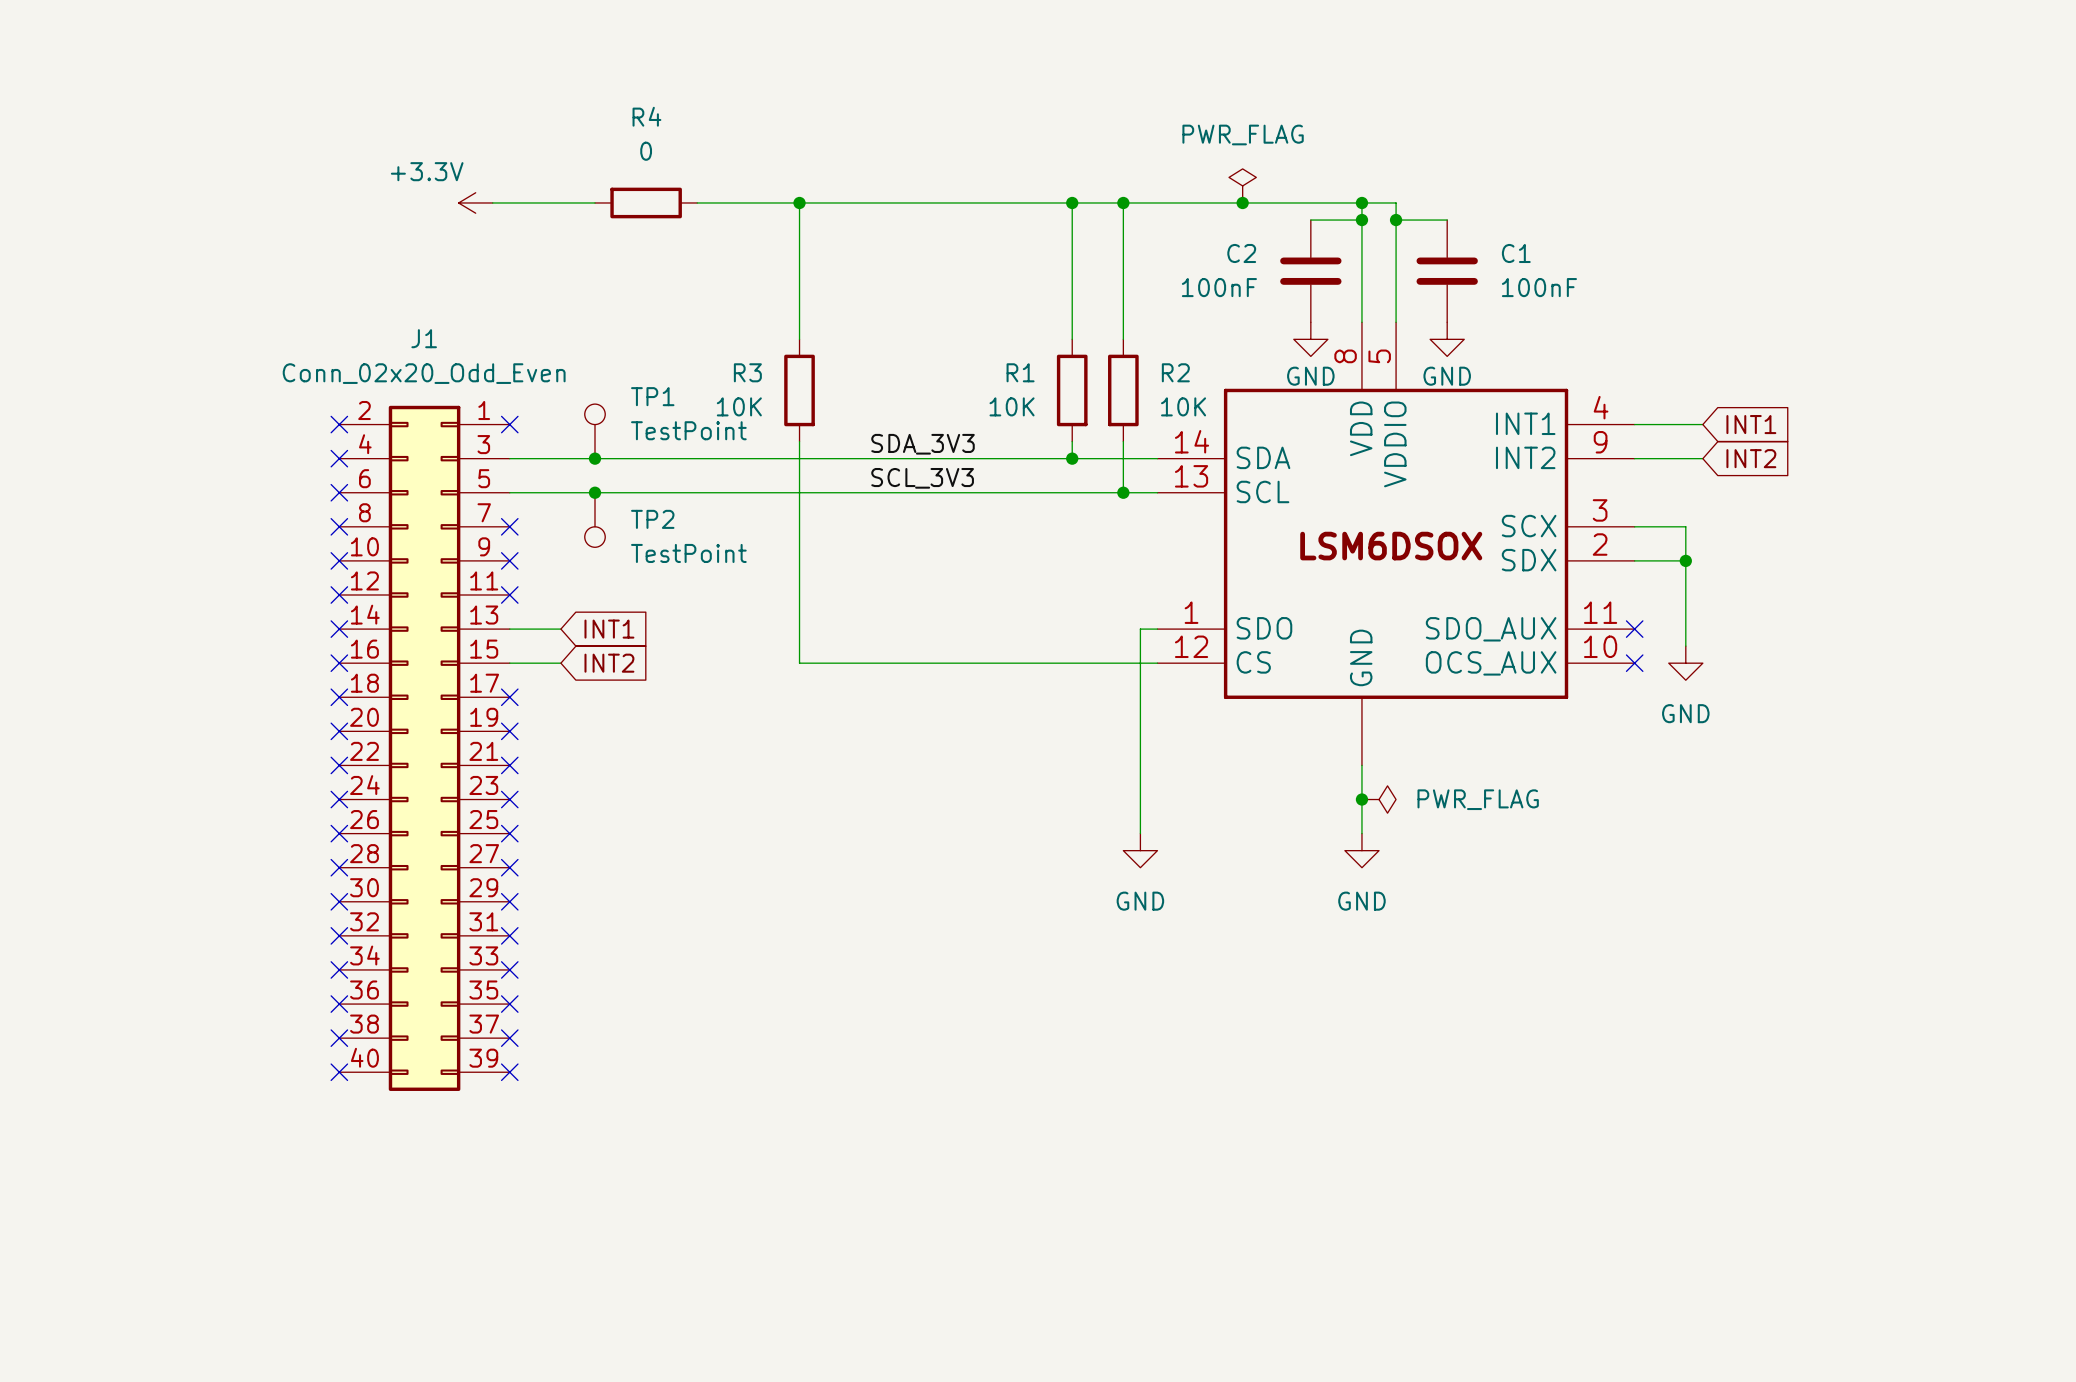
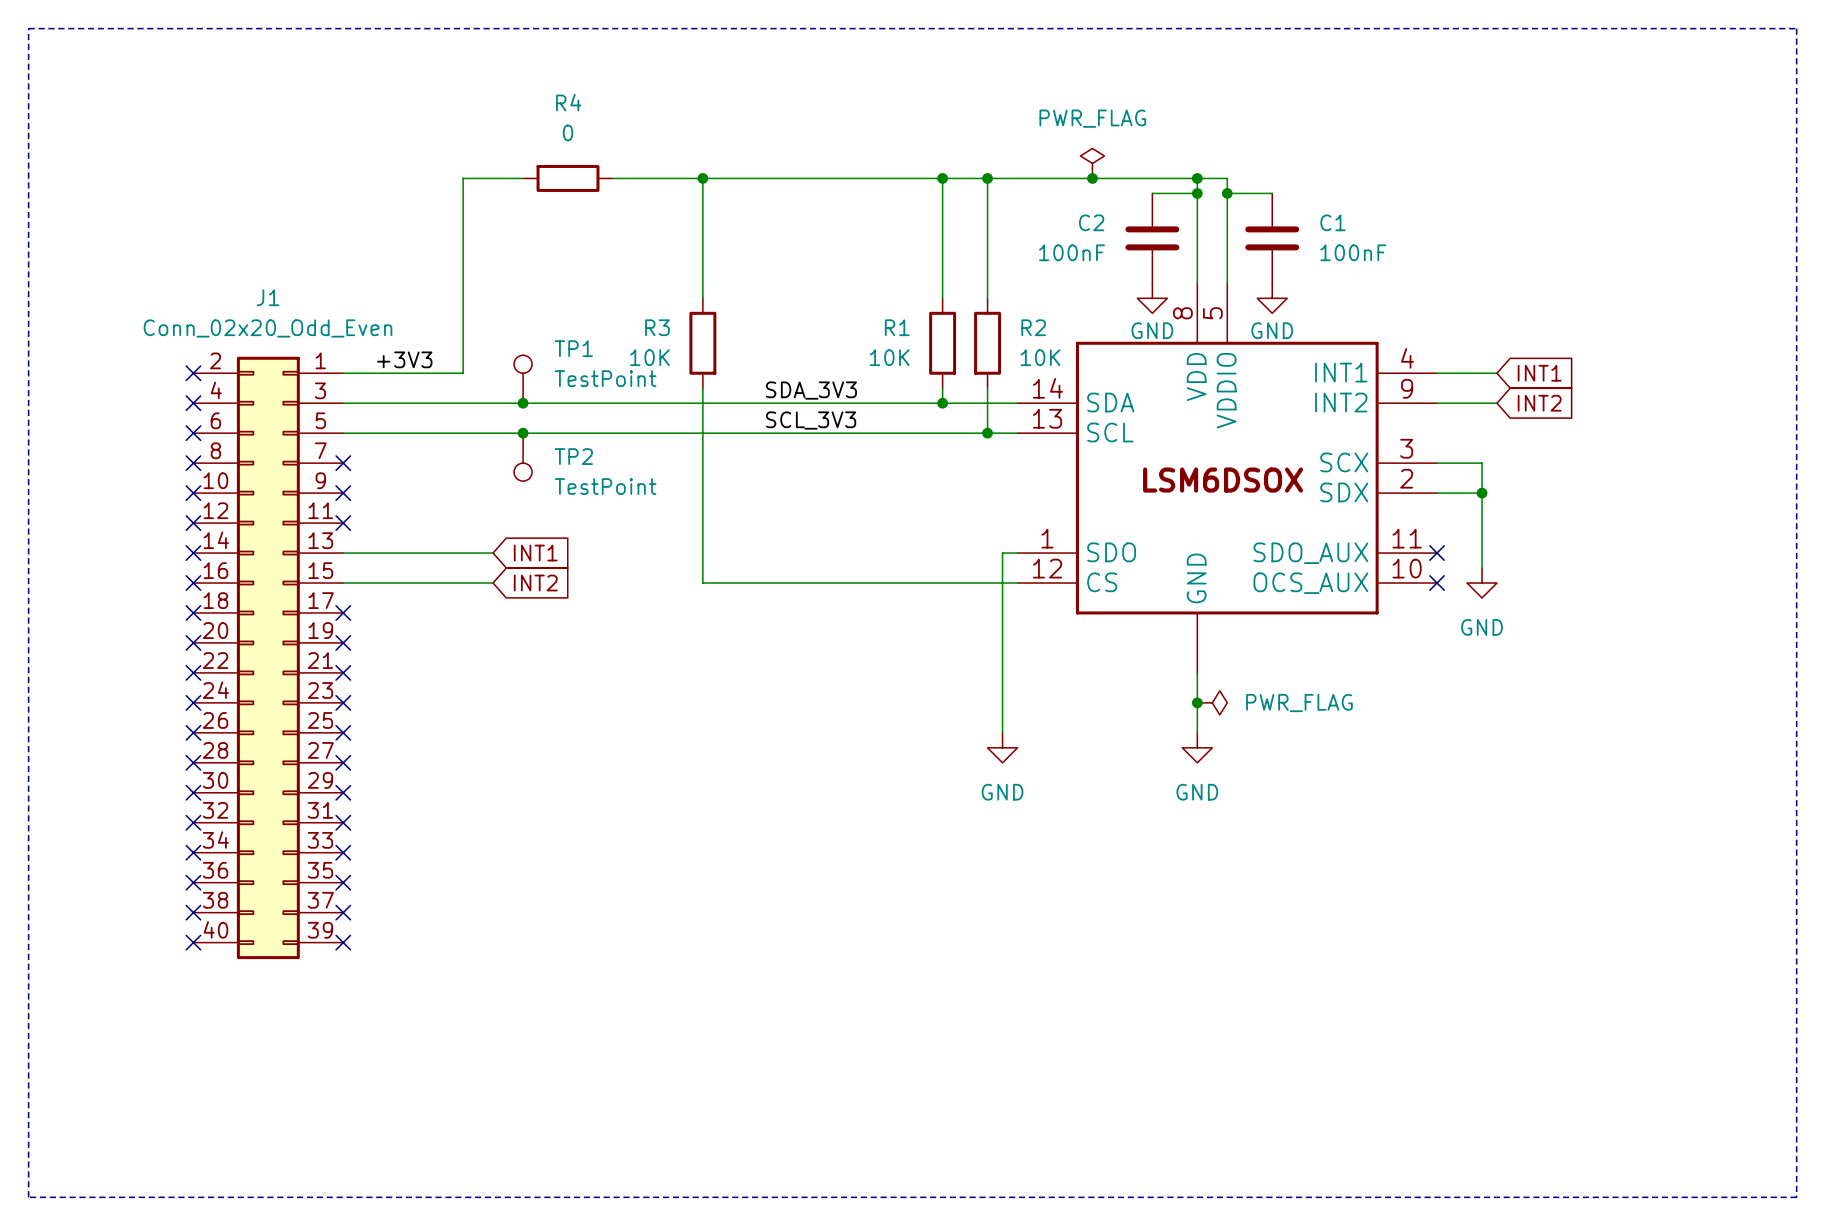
line: none -> (28, 28) (1796, 28) (1796, 1197) (28, 1197) (28, 28)
power symbol: +3.3V (475, 202) -> none
wire: (492, 202) (526, 202) -> (343, 373) (463, 373) (463, 178)
label: none -> +3V3 (404, 359)
no-connect mark: none -> (193, 373)
no-connect mark: (339, 424) -> none
no-connect mark: (509, 424) -> none
no-connect mark: none -> (193, 403)
no-connect mark: (339, 458) -> none
no-connect mark: none -> (193, 433)
no-connect mark: (339, 492) -> none
no-connect mark: none -> (193, 463)
no-connect mark: (339, 526) -> none
no-connect mark: none -> (343, 463)
no-connect mark: (509, 526) -> none
no-connect mark: none -> (193, 493)
no-connect mark: (339, 560) -> none
no-connect mark: none -> (343, 493)
no-connect mark: (509, 560) -> none
no-connect mark: none -> (193, 523)
no-connect mark: (339, 595) -> none
no-connect mark: none -> (343, 523)
no-connect mark: (509, 595) -> none
no-connect mark: none -> (193, 553)
no-connect mark: (339, 629) -> none
no-connect mark: none -> (193, 583)
no-connect mark: (339, 663) -> none
no-connect mark: none -> (193, 612)
no-connect mark: (339, 697) -> none
no-connect mark: none -> (343, 612)
no-connect mark: (509, 697) -> none
no-connect mark: none -> (193, 642)
no-connect mark: (339, 731) -> none
no-connect mark: none -> (343, 642)
no-connect mark: (509, 731) -> none
J1 position: (424, 748) -> (268, 657)
no-connect mark: none -> (193, 672)
no-connect mark: (339, 765) -> none
no-connect mark: none -> (343, 672)
no-connect mark: (509, 765) -> none
no-connect mark: none -> (193, 702)
no-connect mark: (339, 799) -> none
no-connect mark: none -> (343, 702)
no-connect mark: (509, 799) -> none
no-connect mark: none -> (193, 732)
no-connect mark: (339, 833) -> none
no-connect mark: none -> (343, 732)
no-connect mark: (509, 833) -> none
no-connect mark: none -> (193, 762)
no-connect mark: (339, 867) -> none
no-connect mark: none -> (343, 762)
no-connect mark: (509, 867) -> none
no-connect mark: none -> (193, 792)
no-connect mark: (339, 901) -> none
no-connect mark: none -> (343, 792)
no-connect mark: (509, 901) -> none
no-connect mark: none -> (193, 822)
no-connect mark: (339, 935) -> none
no-connect mark: none -> (343, 822)
no-connect mark: (509, 935) -> none
no-connect mark: none -> (193, 852)
no-connect mark: (339, 969) -> none
no-connect mark: none -> (343, 852)
no-connect mark: (509, 969) -> none
no-connect mark: none -> (193, 882)
no-connect mark: (339, 1004) -> none
no-connect mark: none -> (343, 882)
no-connect mark: (509, 1004) -> none
no-connect mark: none -> (193, 912)
no-connect mark: (339, 1038) -> none
no-connect mark: none -> (343, 912)
no-connect mark: (509, 1038) -> none
no-connect mark: none -> (193, 942)
no-connect mark: (339, 1072) -> none
no-connect mark: none -> (343, 942)
no-connect mark: (509, 1072) -> none

